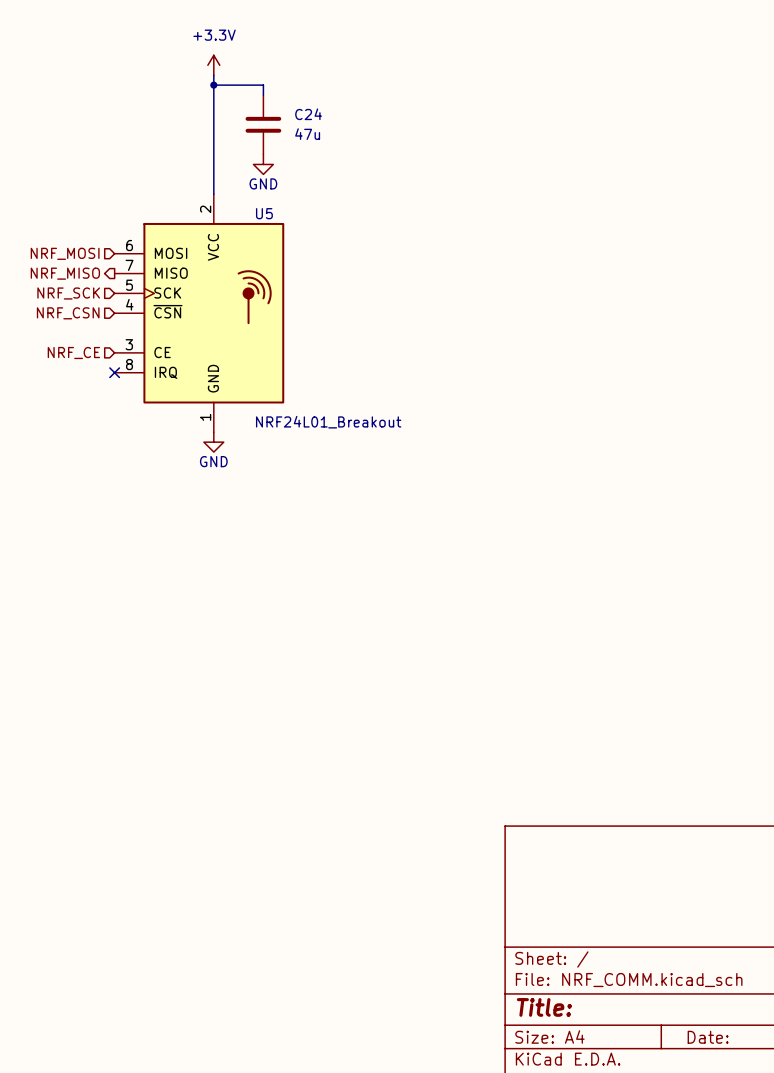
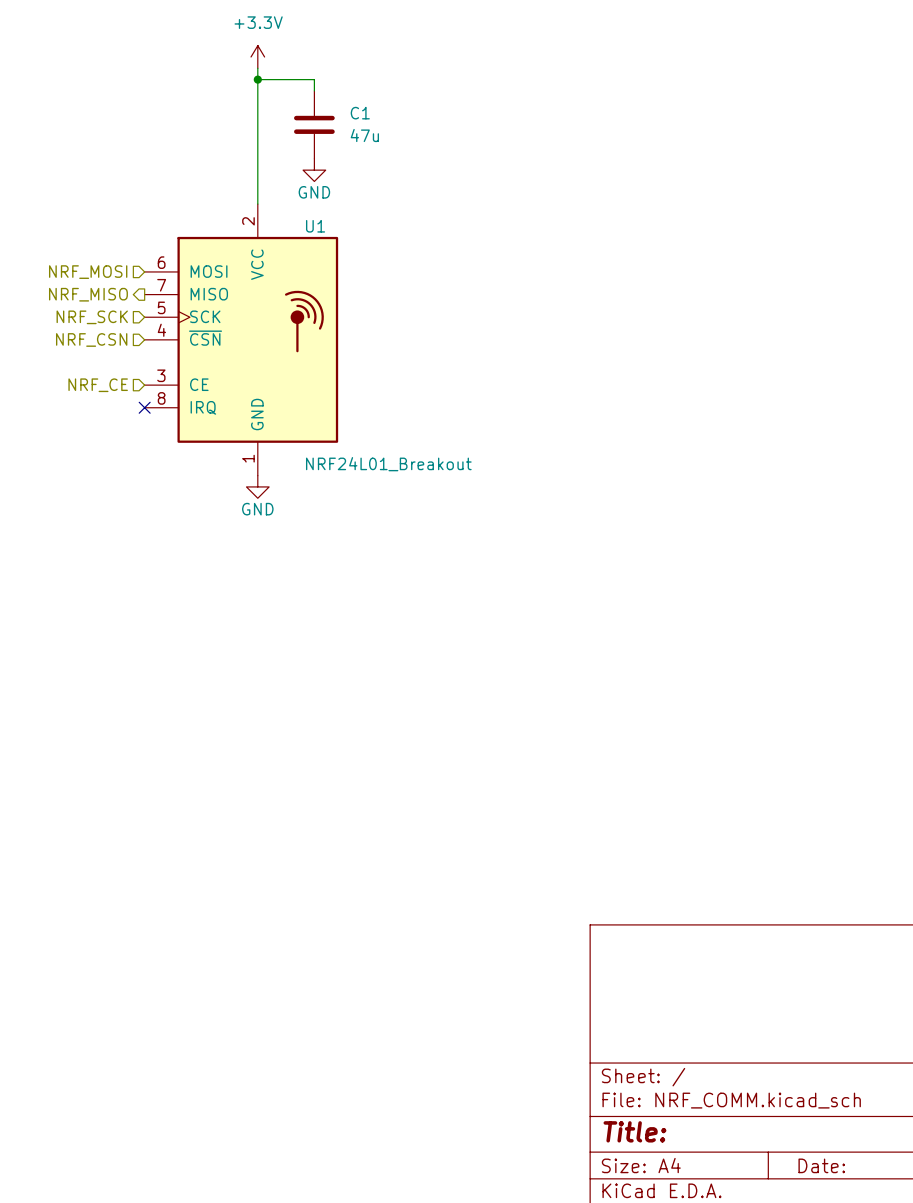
C24 name: C24 (308, 114) -> C1 (360, 113)
U5 name: U5 (264, 213) -> U1 (315, 226)

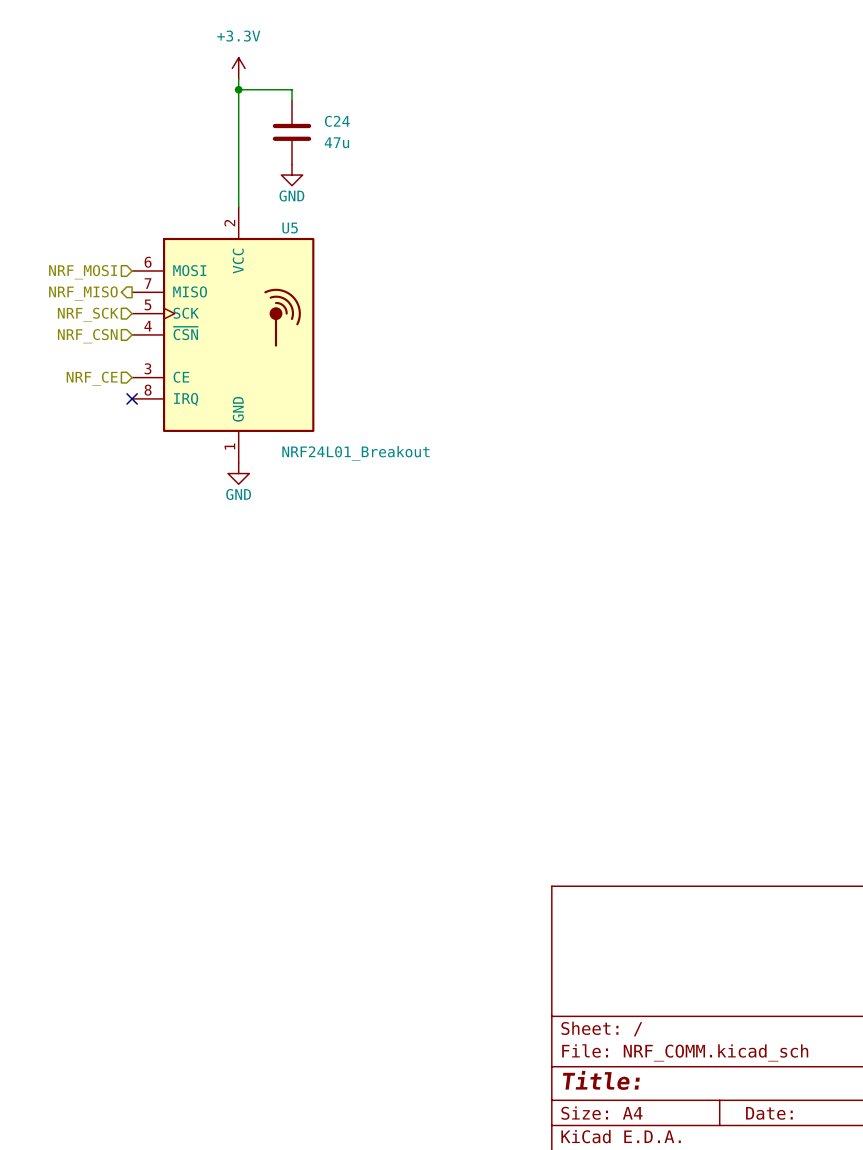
C1 name: C1 (360, 113) -> C24 (337, 121)
U1 name: U1 (315, 226) -> U5 (290, 228)

